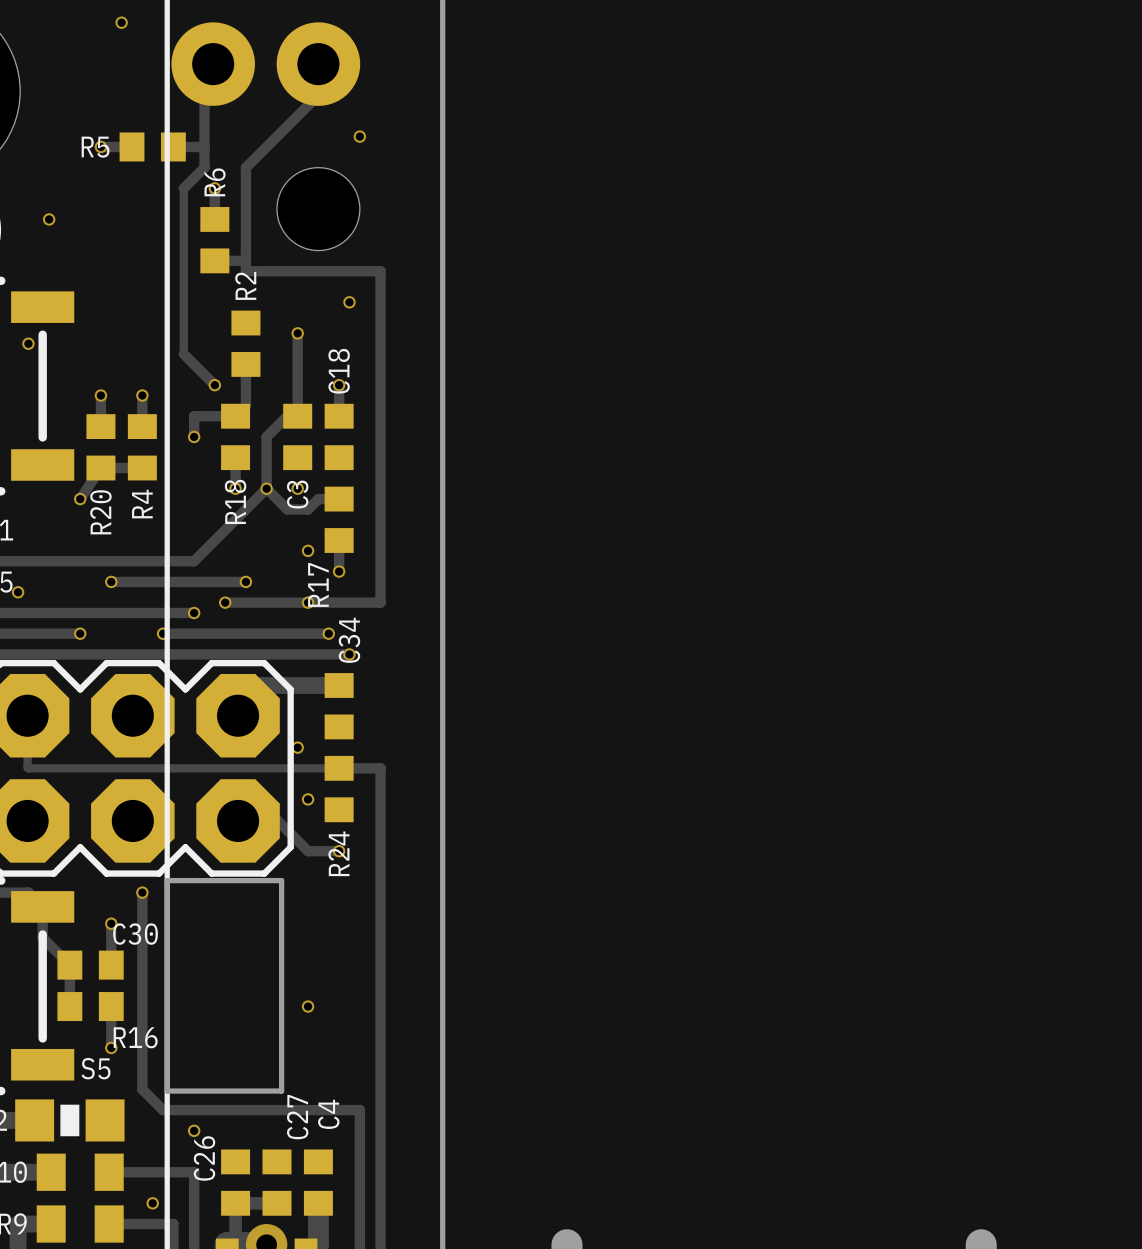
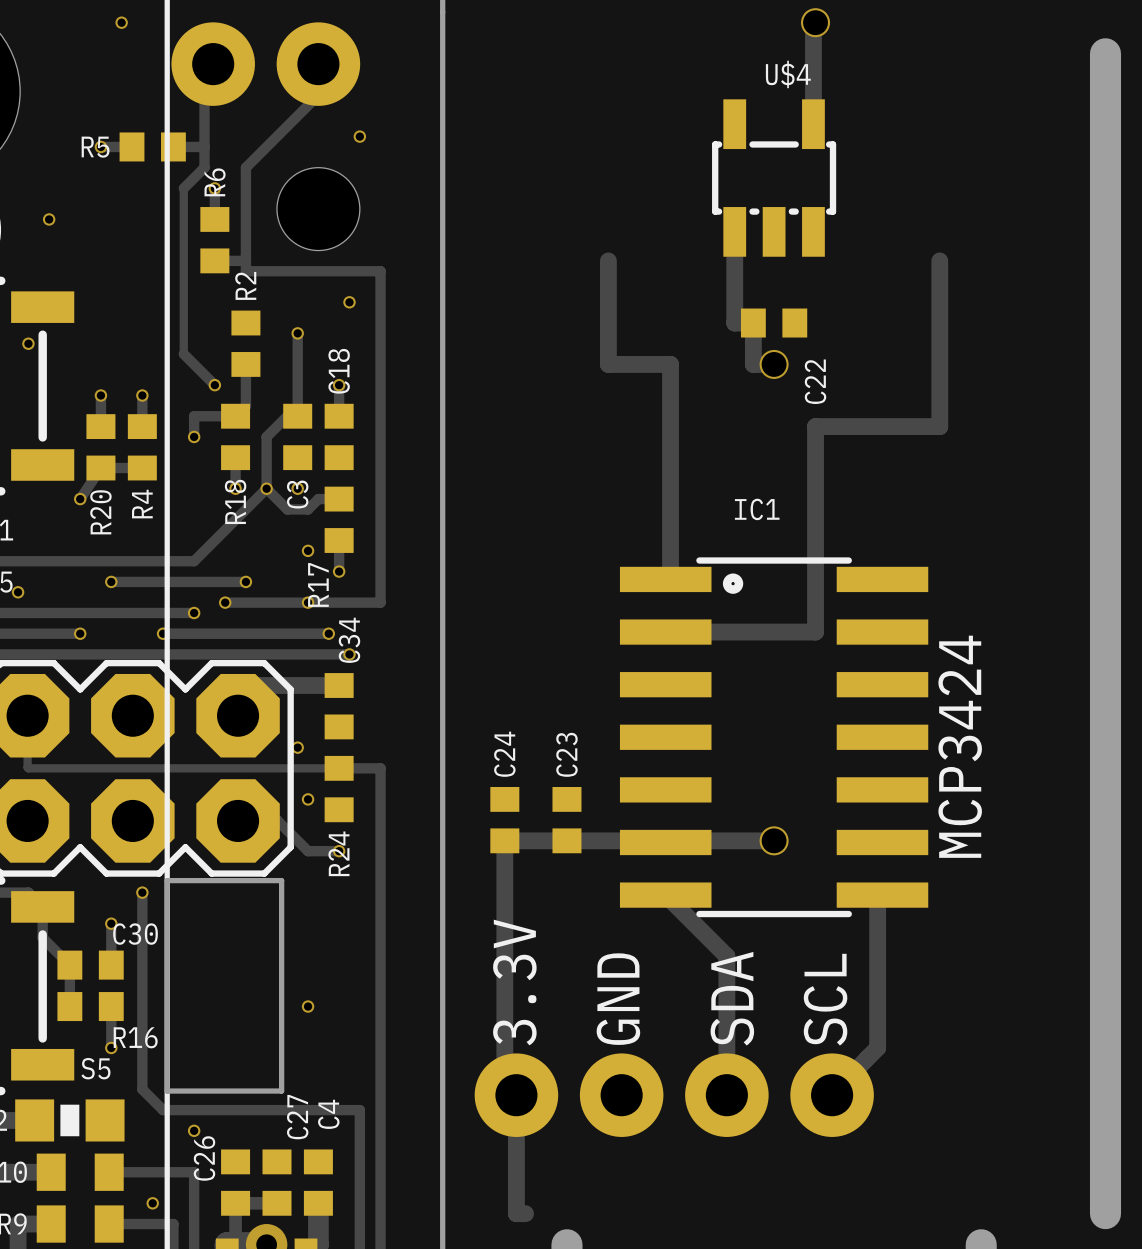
track: none -> (815, 22) (813, 24) (813, 124)
via: none -> (815, 22)
board edge: none -> (1105, 53) (1105, 1213)
U$4: none -> (774, 178)
track: none -> (734, 231) (734, 323) (753, 323) (753, 364) (774, 364)
track: none -> (608, 260) (608, 364) (670, 364) (670, 579) (665, 579)
track: none -> (939, 260) (939, 426) (815, 426) (815, 632) (665, 632)
C22: none -> (774, 323)
via: none -> (774, 364)
IC1: none -> (774, 737)
text: none -> MCP3424 (960, 746)
C24: none -> (504, 820)
C23: none -> (566, 820)
track: none -> (774, 840) (504, 840) (504, 1095) (516, 1095) (516, 1213) (525, 1213)
via: none -> (774, 840)
track: none -> (665, 895) (726, 956) (726, 1095)
track: none -> (882, 895) (882, 898) (877, 902) (877, 1047) (832, 1095)
text: none -> 3.3V (514, 982)
text: none -> SDA (732, 998)
text: none -> GND (618, 999)
text: none -> SCL (825, 999)
part: none -> (516, 1095)
part: none -> (621, 1095)
part: none -> (726, 1095)
part: none -> (832, 1095)

